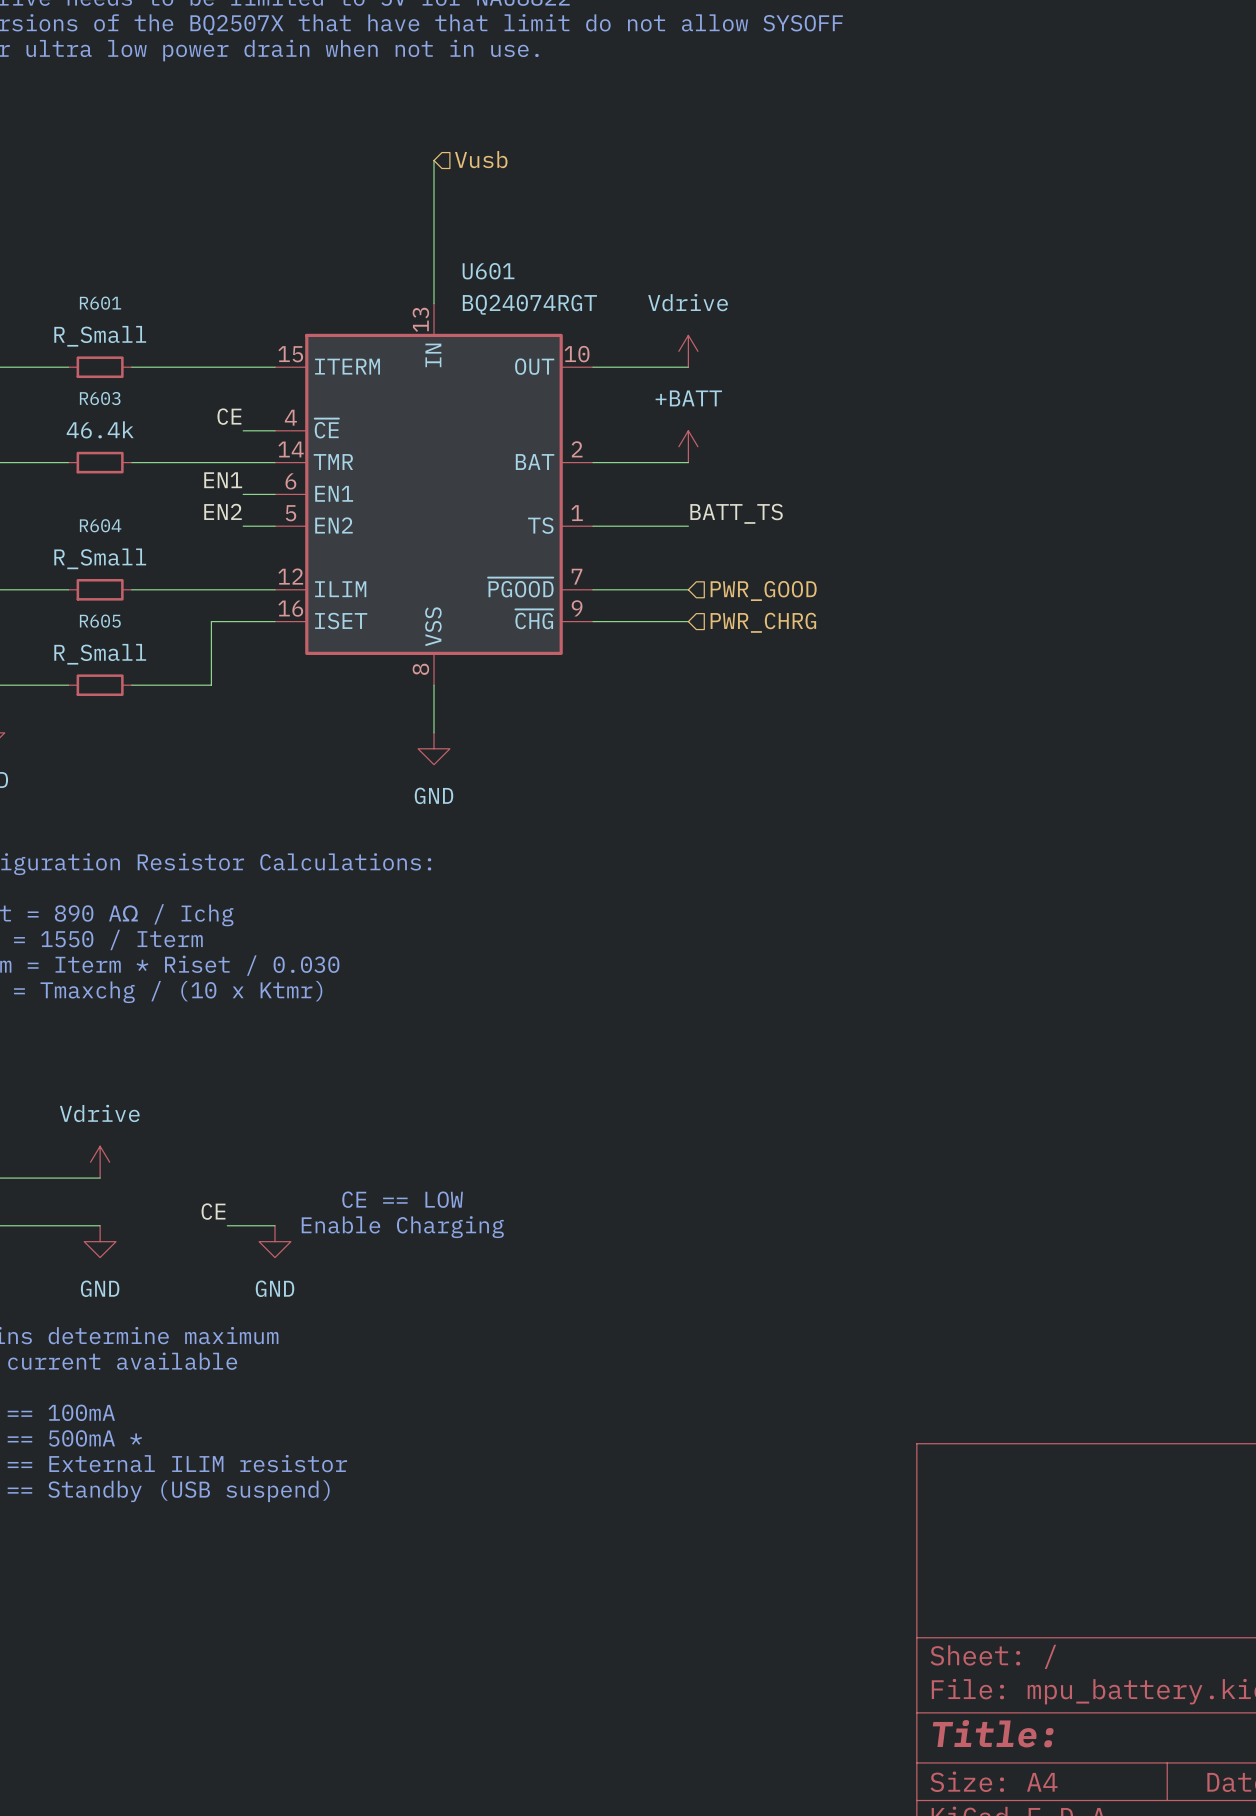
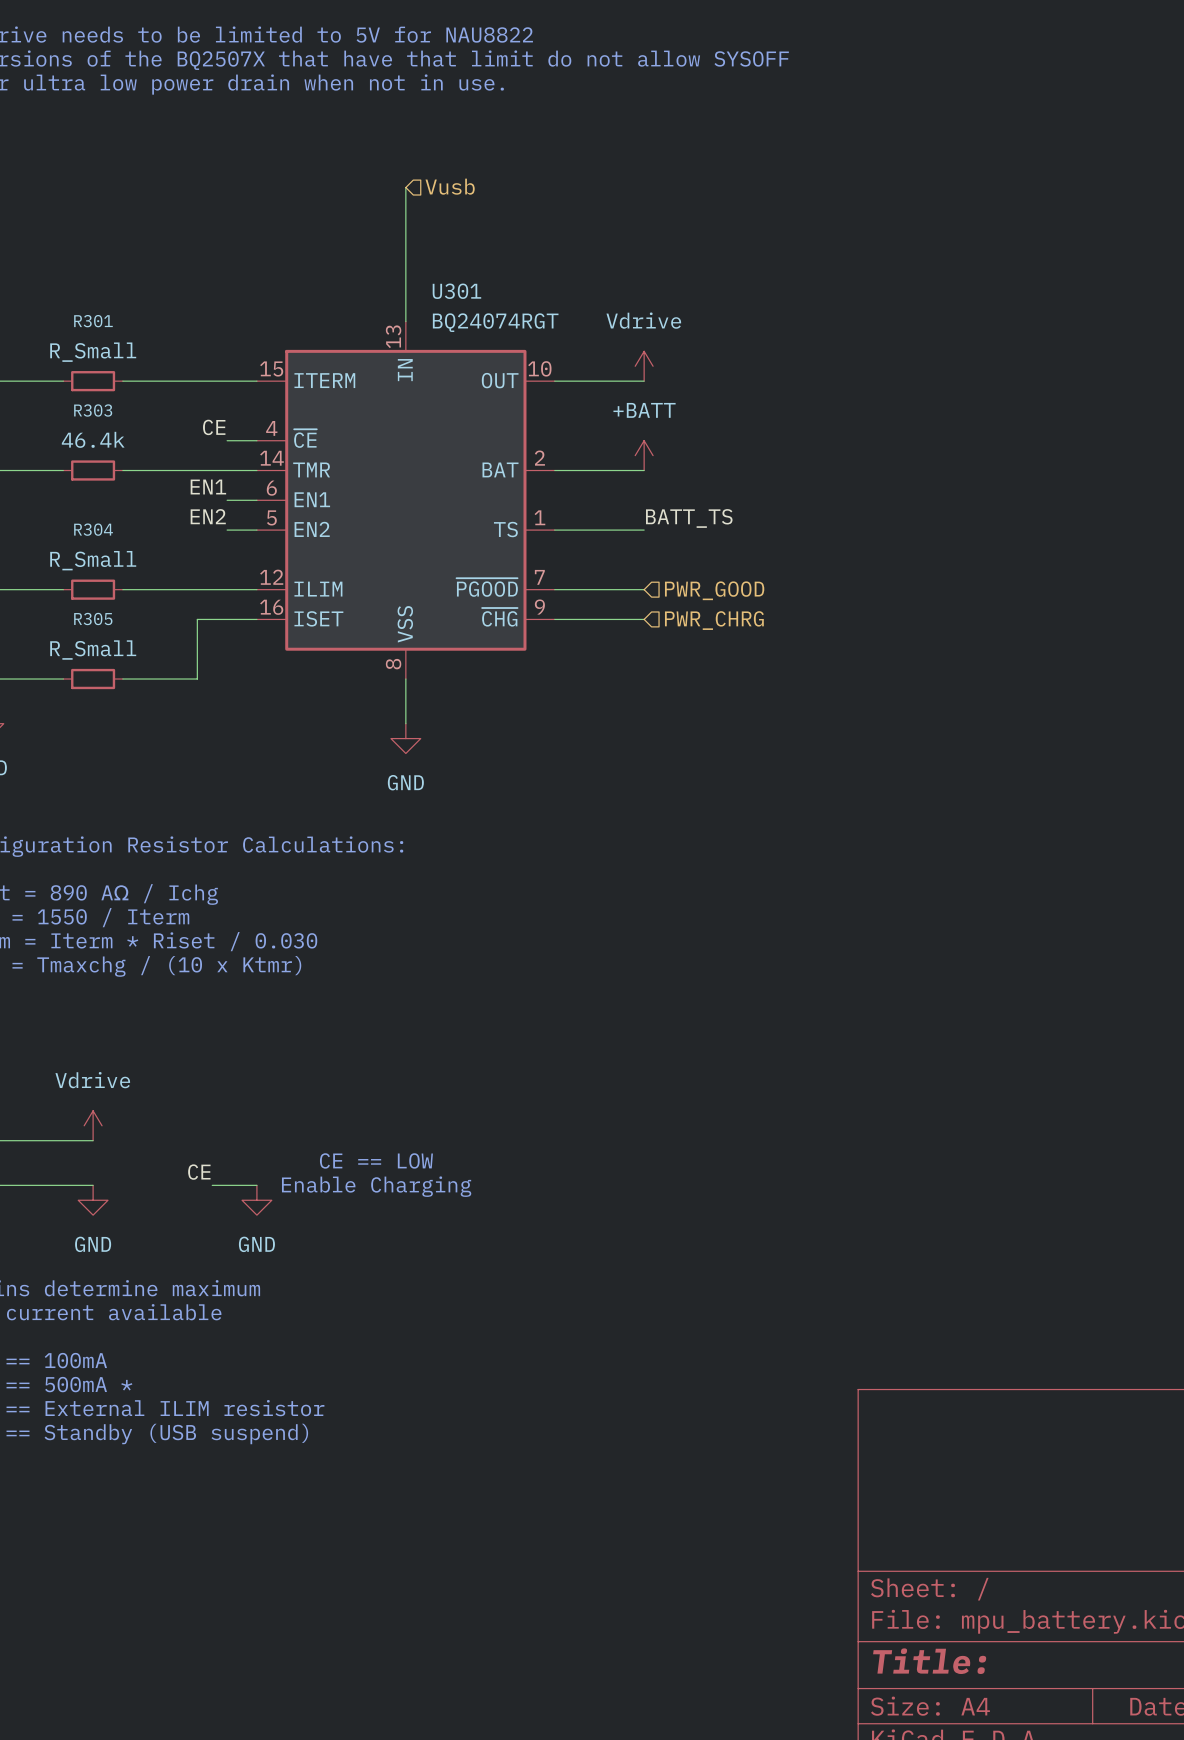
U601 name: U601 (488, 271) -> U301 (456, 291)
R601 name: R601 (100, 303) -> R301 (93, 321)
R603 name: R603 (100, 398) -> R303 (93, 410)
R604 name: R604 (100, 525) -> R304 (93, 529)
R605 name: R605 (100, 621) -> R305 (93, 618)

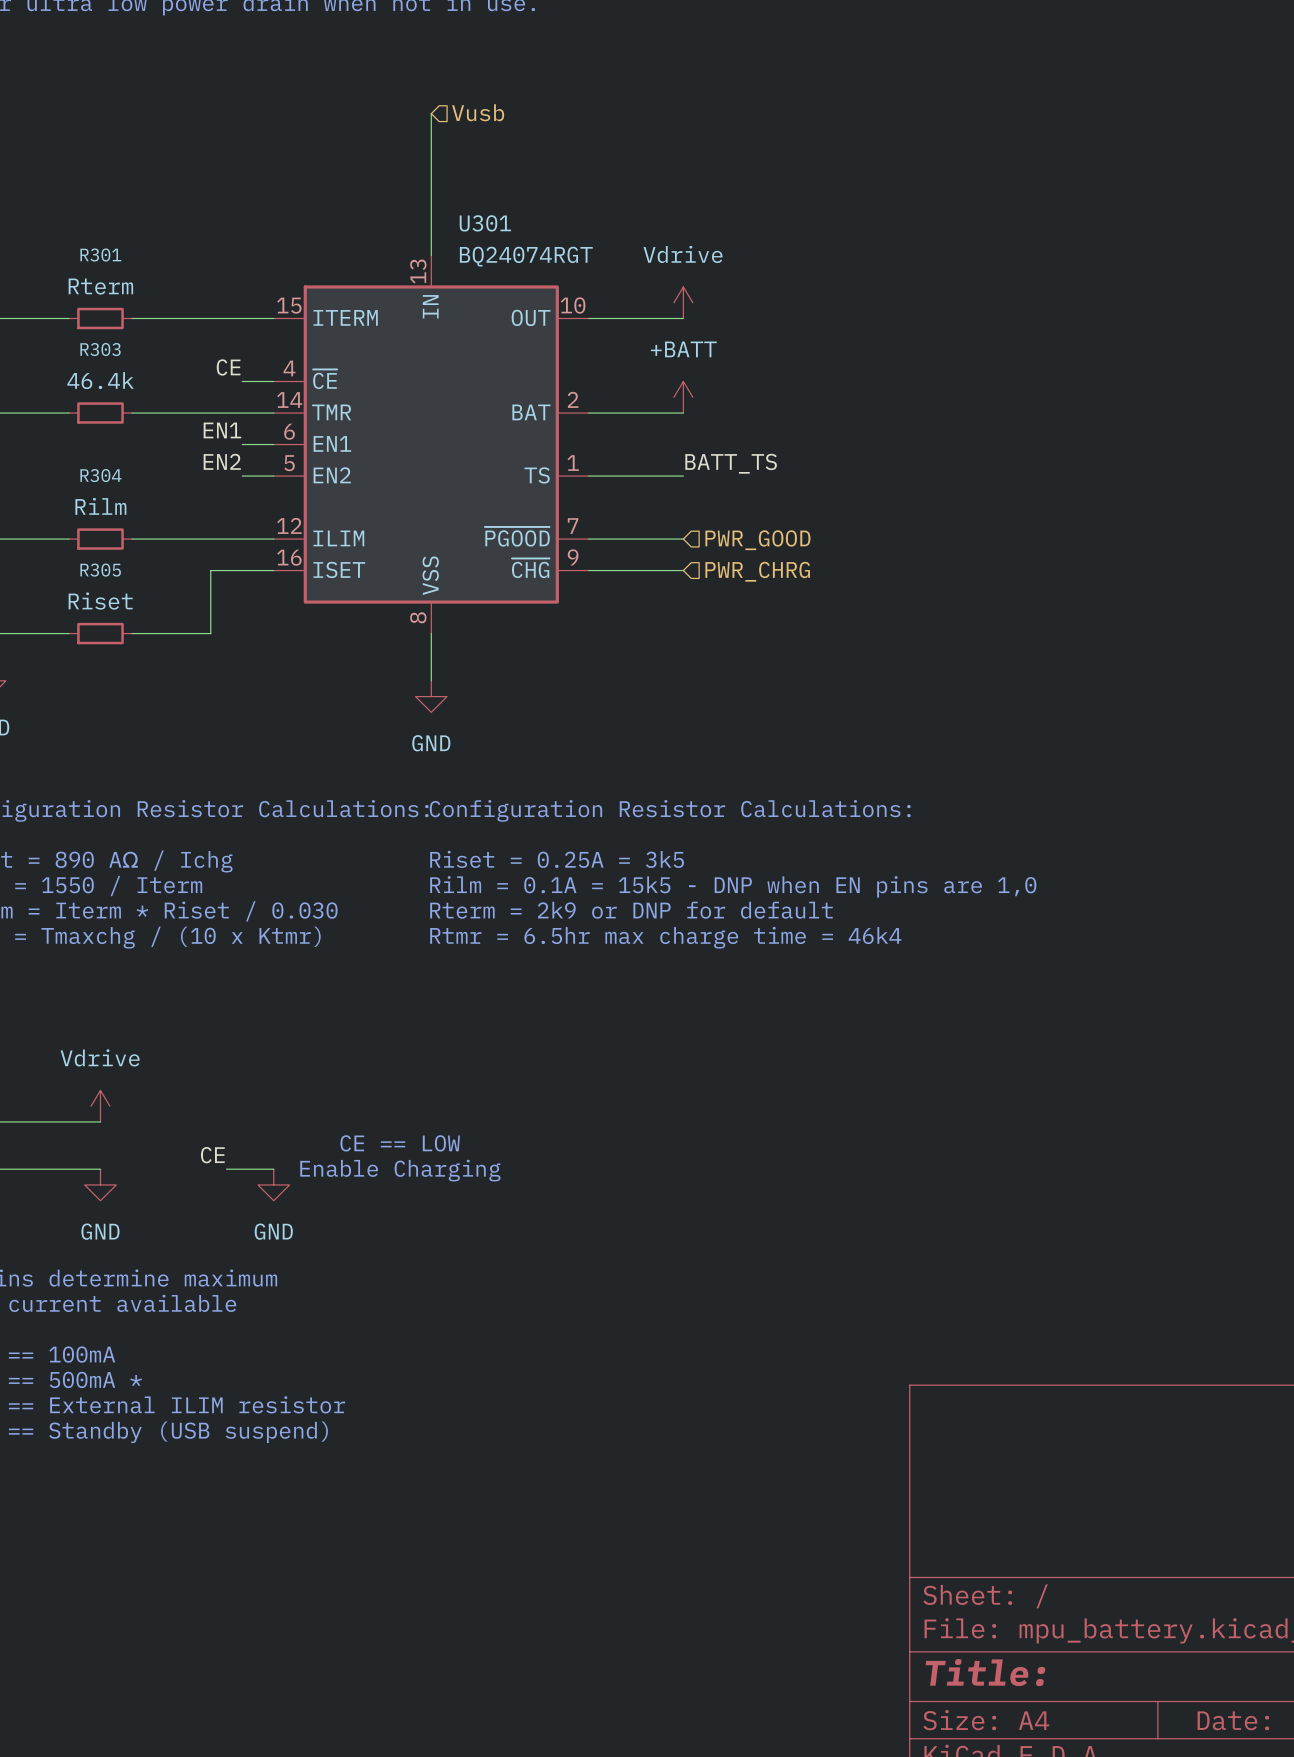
R301 value: R_Small (93, 352) -> Rterm (100, 286)
R304 value: R_Small (93, 560) -> Rilm (100, 506)
R305 value: R_Small (93, 650) -> Riset (100, 601)
text: none -> Configuration Resistor Calculations: (670, 810)
text: none -> Riset = 0.25A = 3k5 (557, 859)
text: none -> Rilm = 0.1A = 15k5 - DNP when EN pins are 1,0 (733, 886)
text: none -> Rterm = 2k9 or DNP for default (631, 910)
text: none -> Rtmr = 6.5hr max charge time = 46k4 (665, 937)

